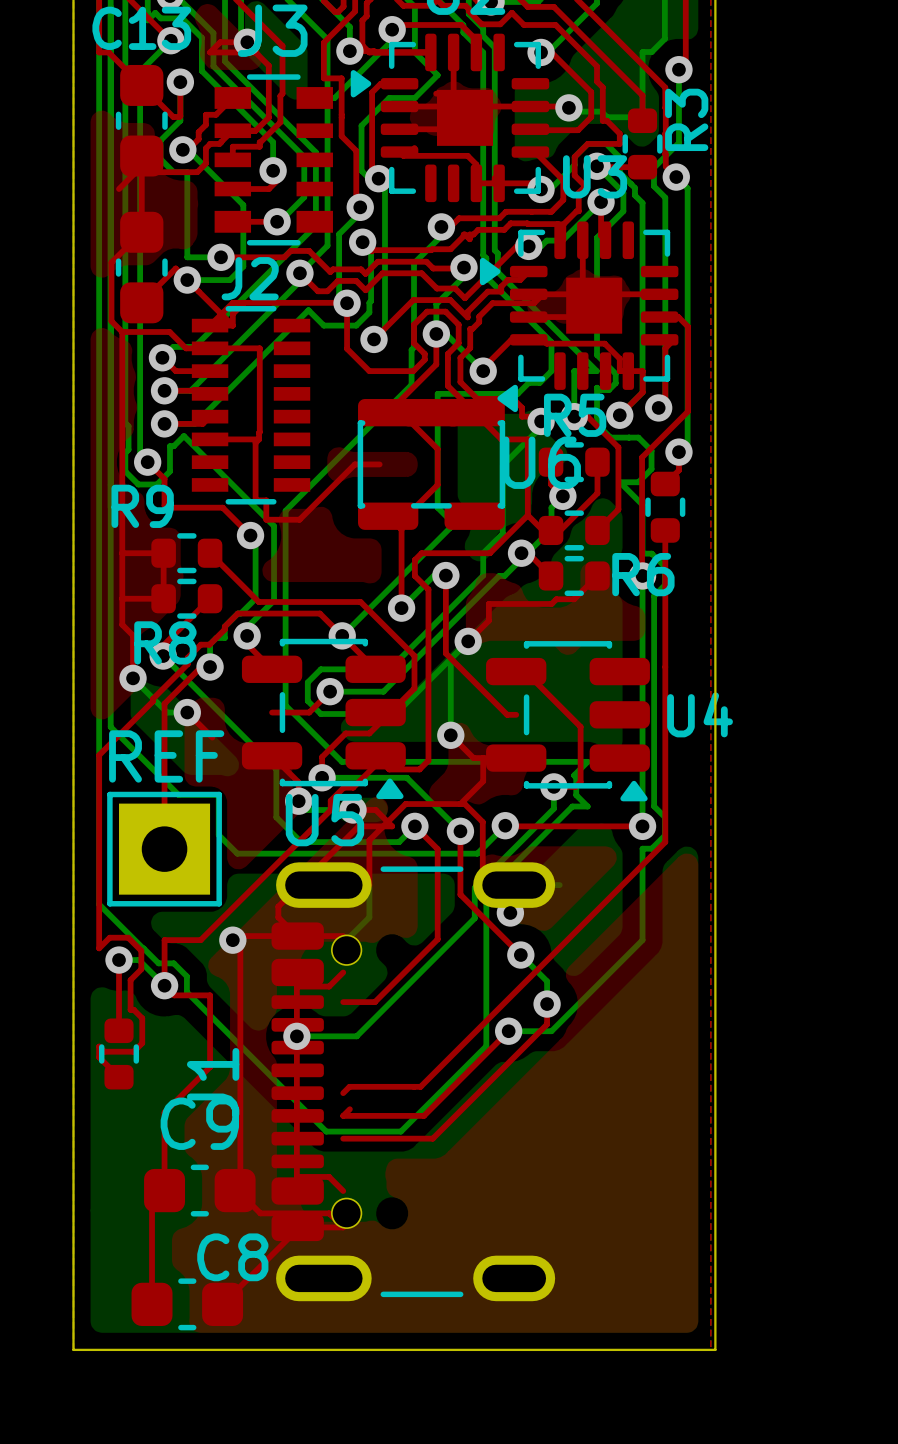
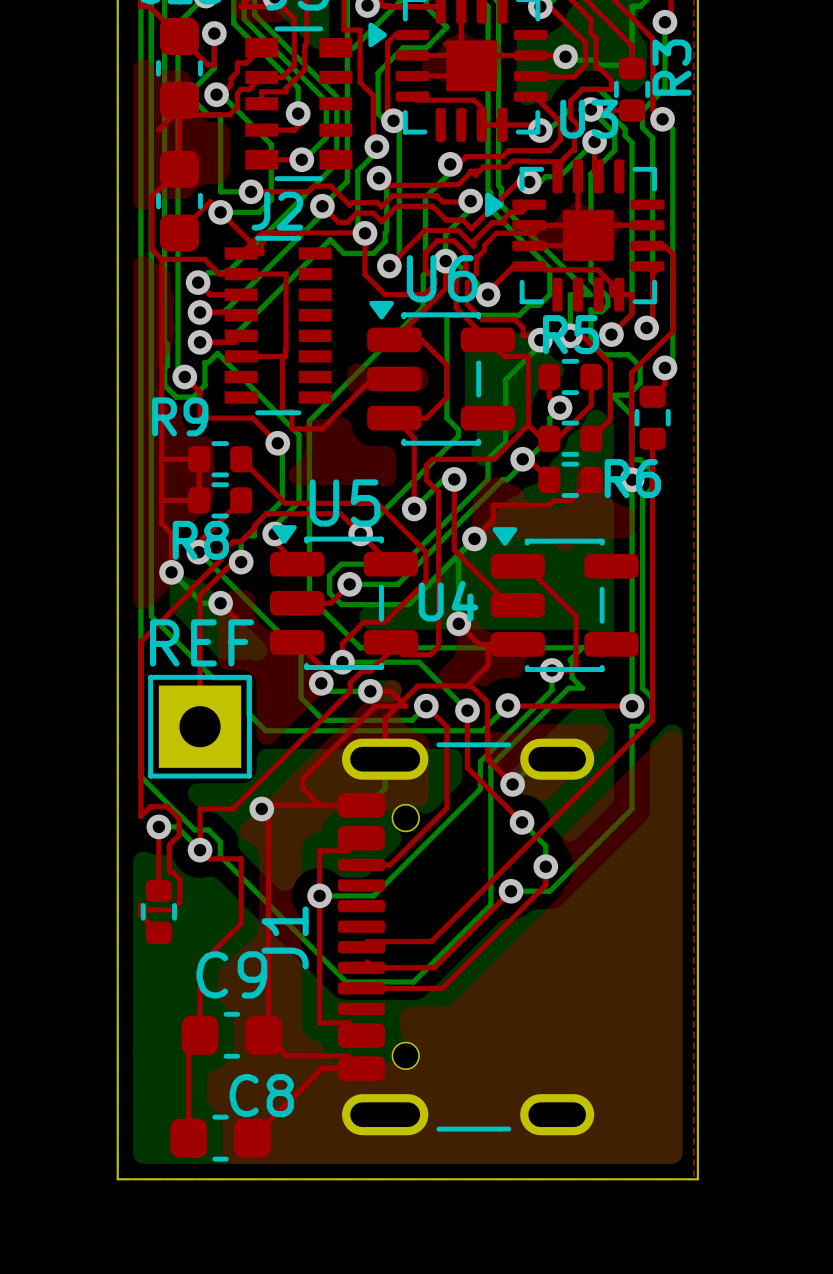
U6 footprint: [357, 384, 518, 530] -> [367, 300, 516, 446]
U6 name position: U6 (541, 462) -> U6 (442, 278)
U5 rotation: 0° (323, 718) -> 180° (344, 597)
U4 rotation: 0° (568, 721) -> 180° (564, 599)
J1 position: (413, 1081) -> (466, 936)

